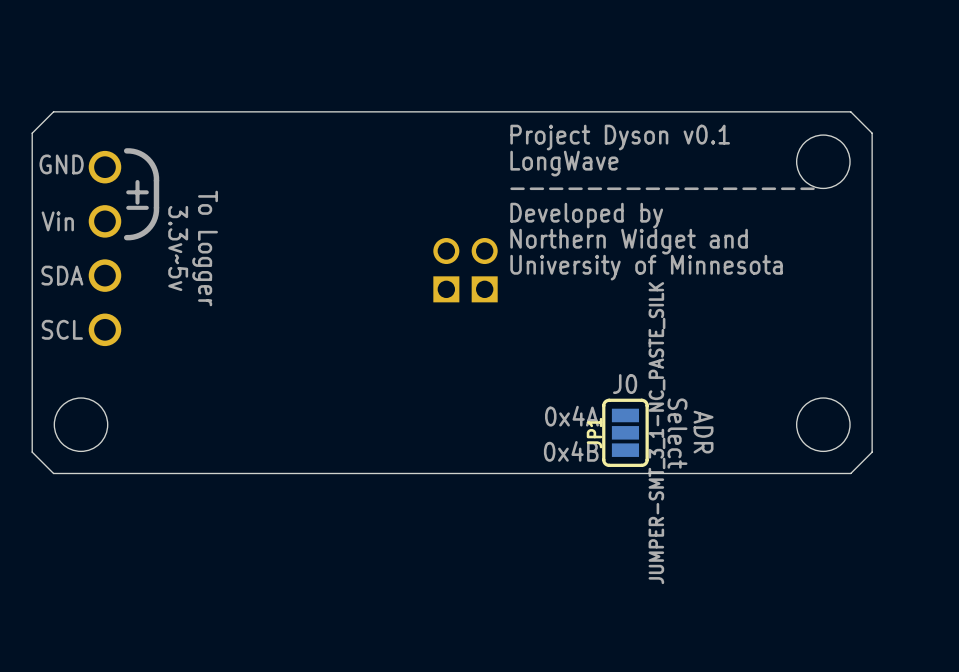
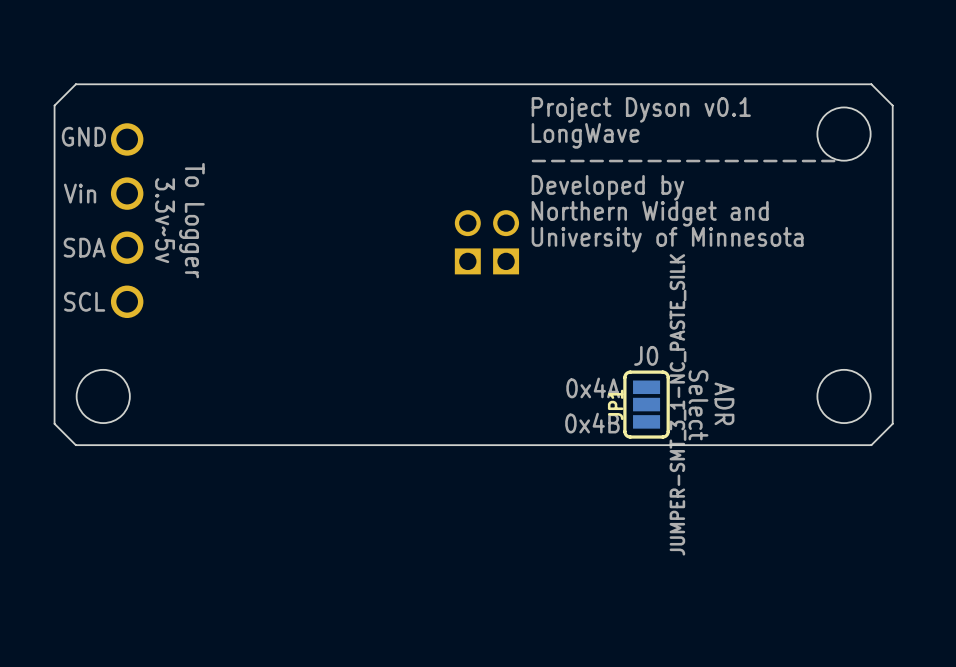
line: (126, 150) (139, 153) (148, 159) (153, 167) (156, 180) (156, 211) (153, 221) (142, 233) (126, 237) -> none
text: ± (137, 194) -> none
text: none -> 3.3v~5v (165, 220)
text: 3.3v~5v (178, 248) -> To Logger (191, 220)
text: To Logger (205, 248) -> none

